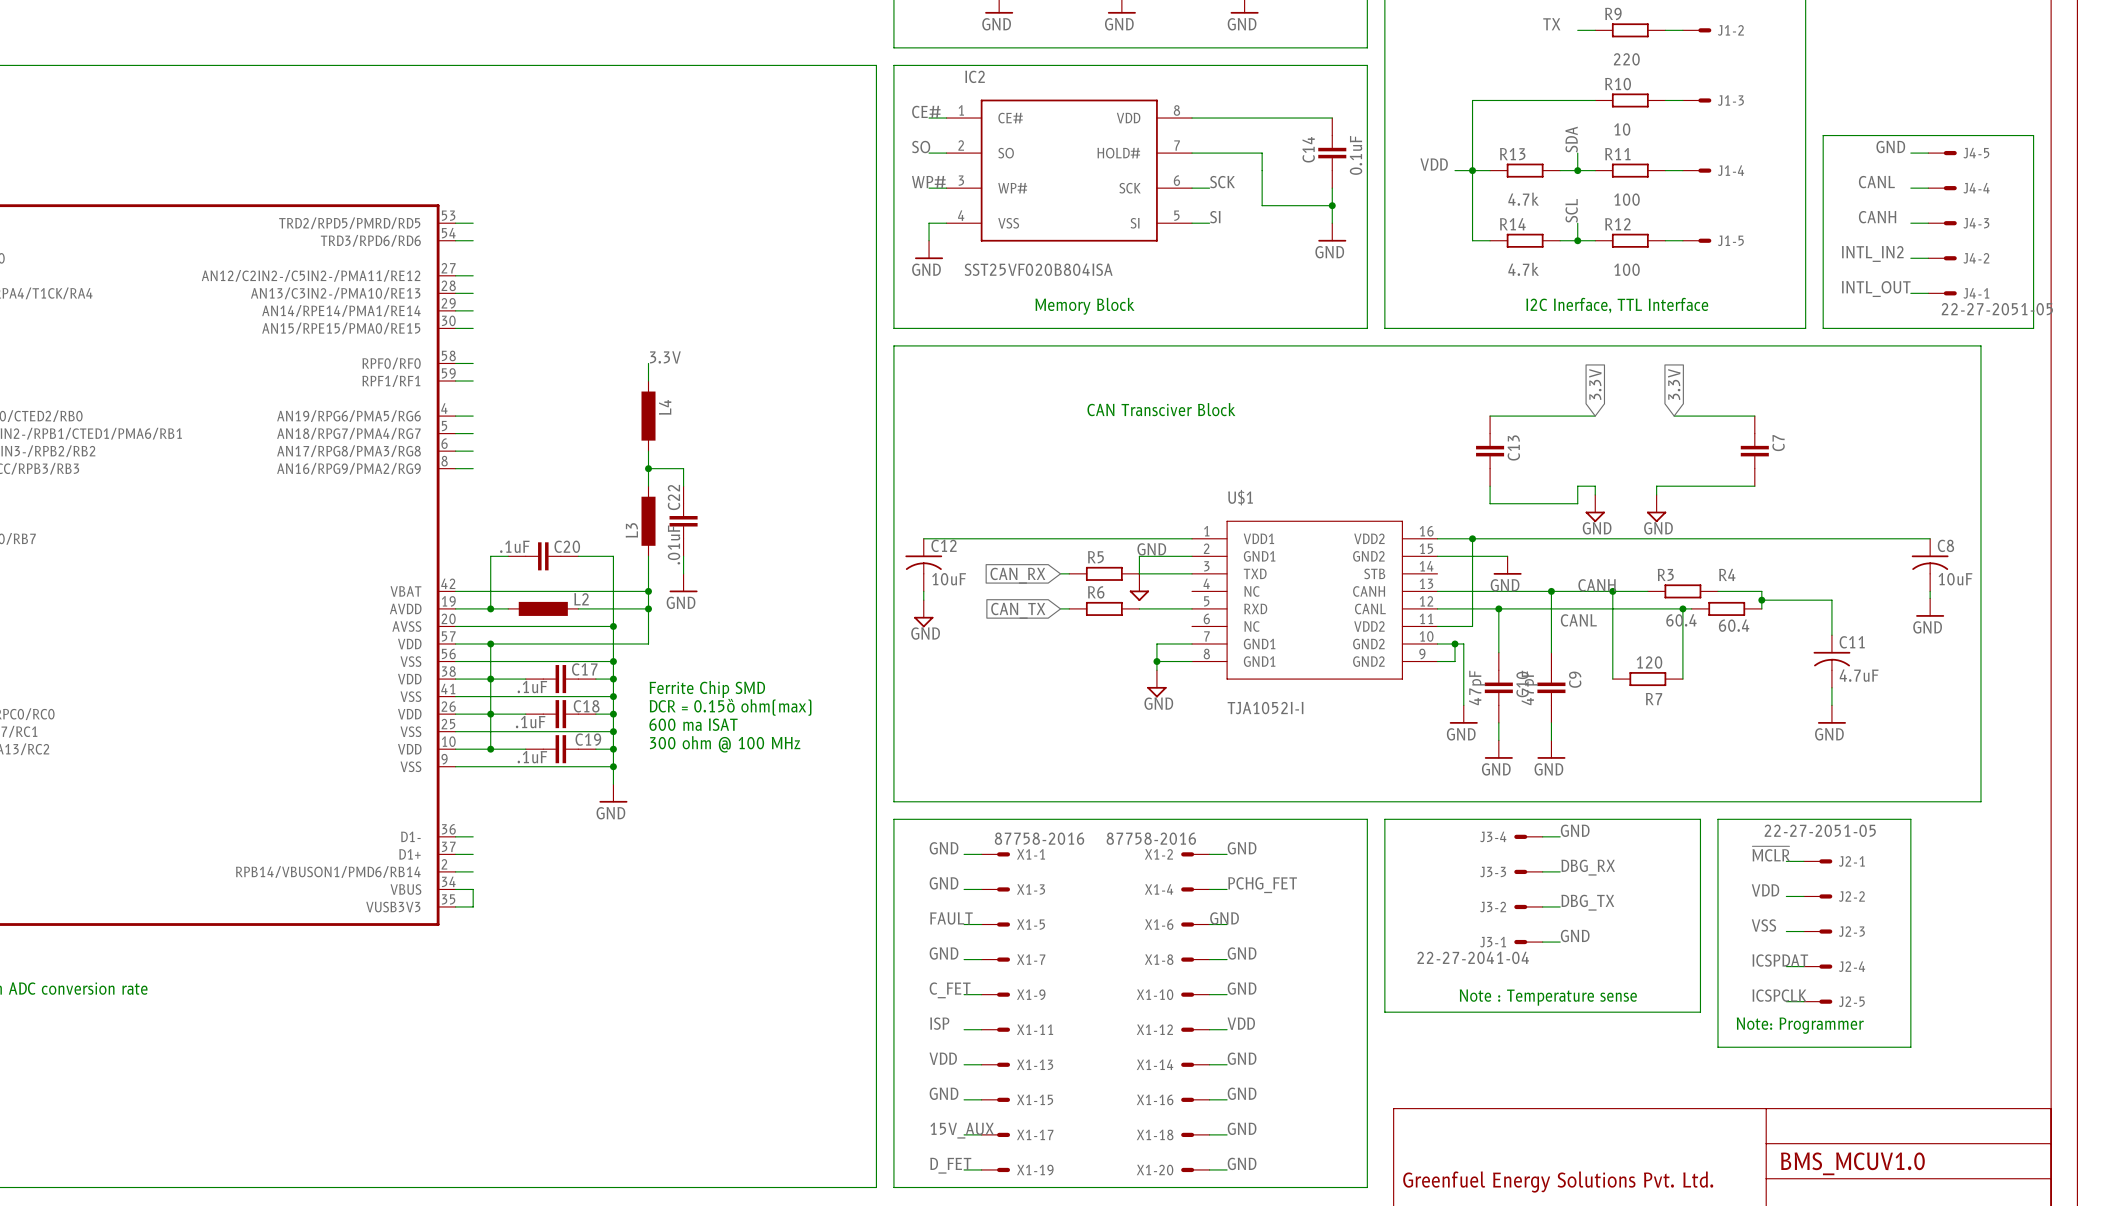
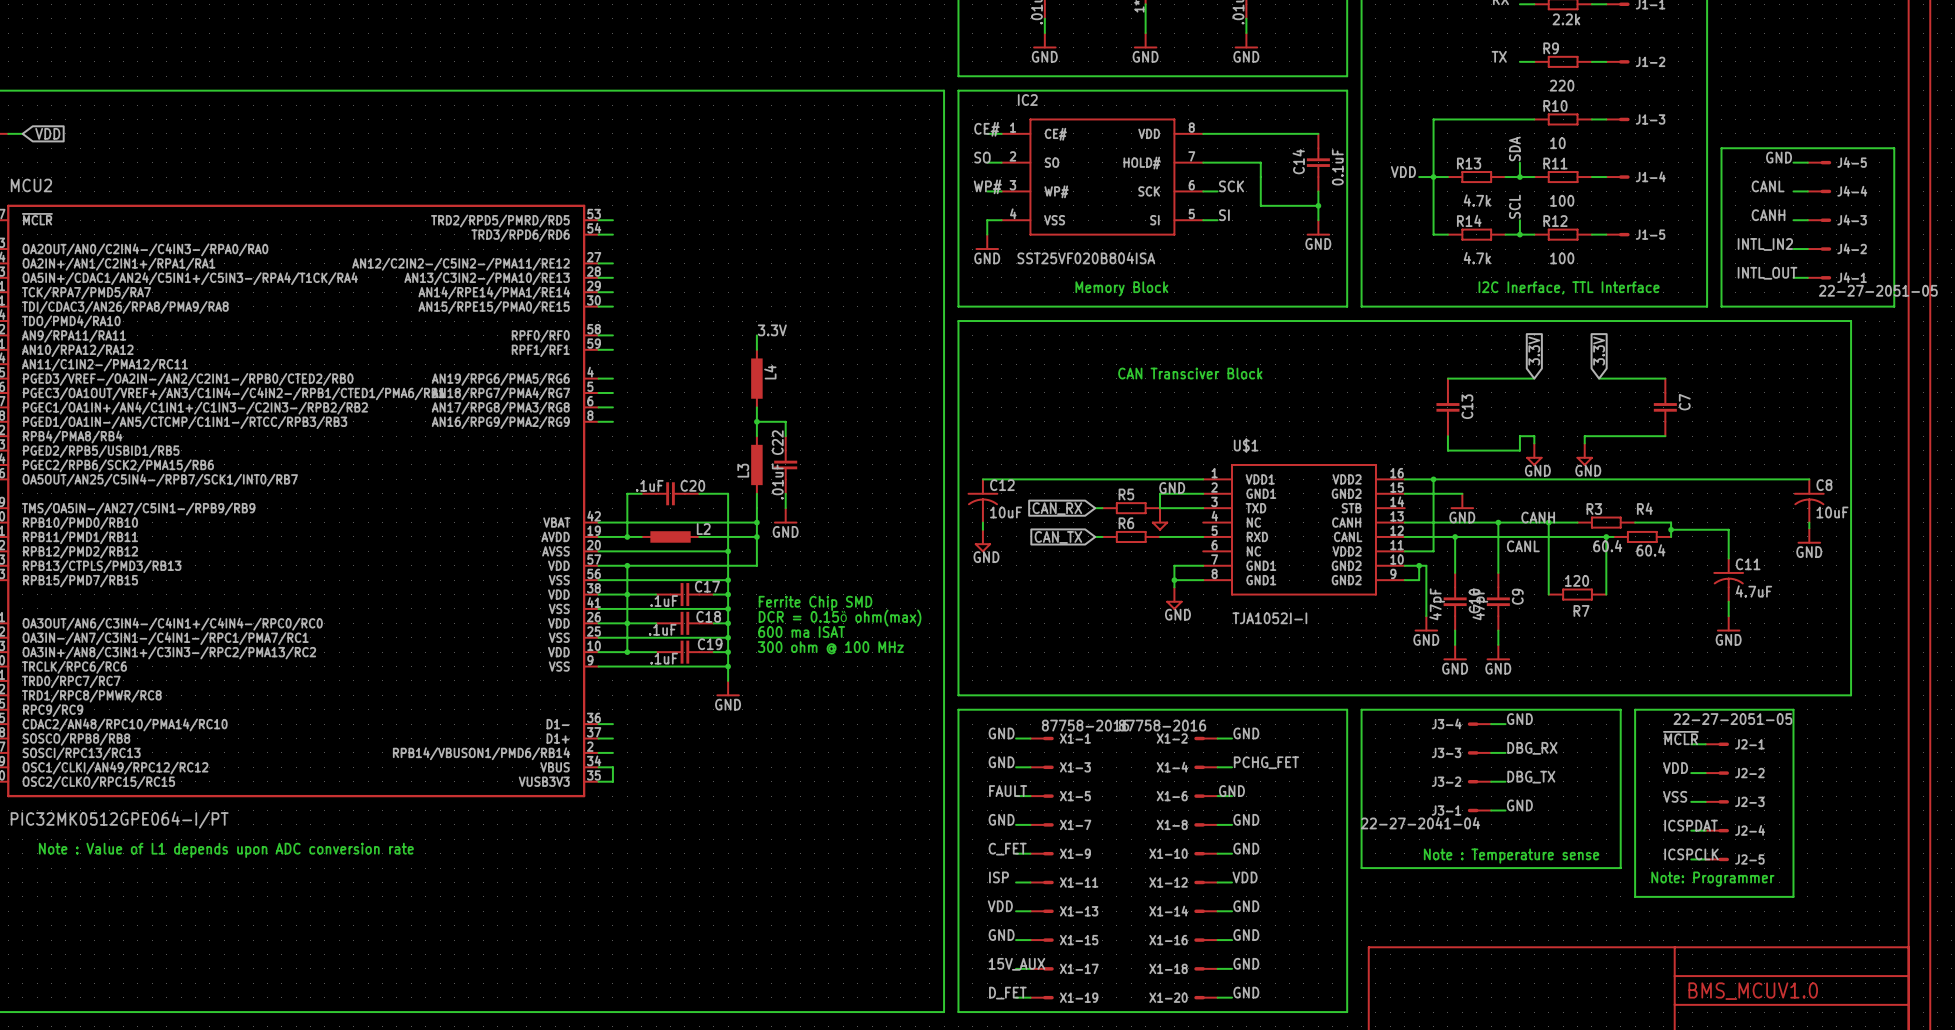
text: Greenfuel Energy Solutions Pvt. Ltd. (1558, 1182) -> none

